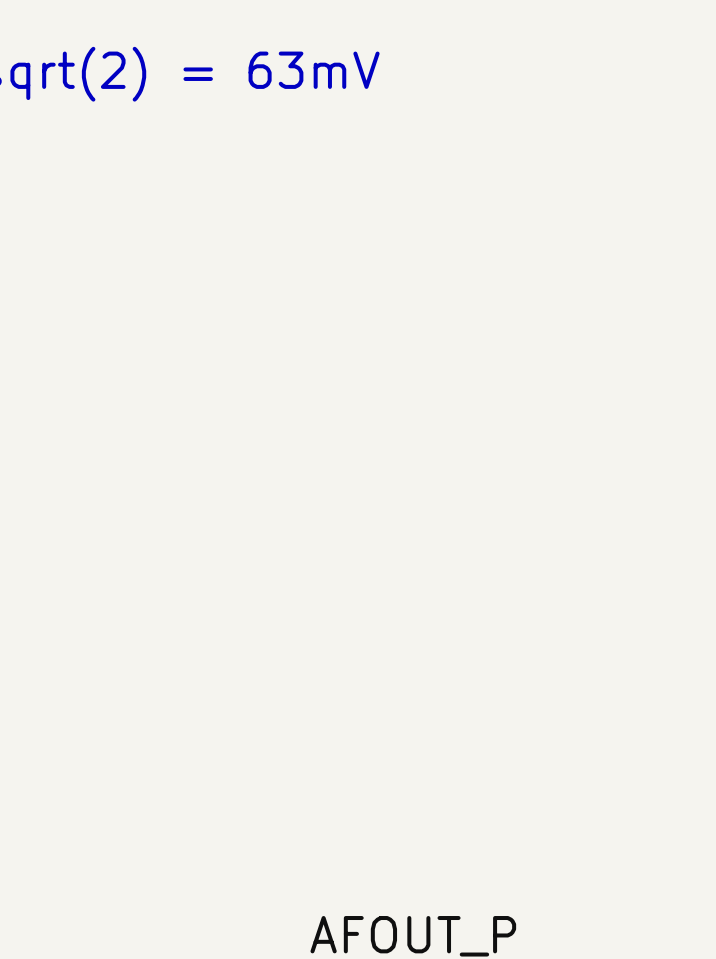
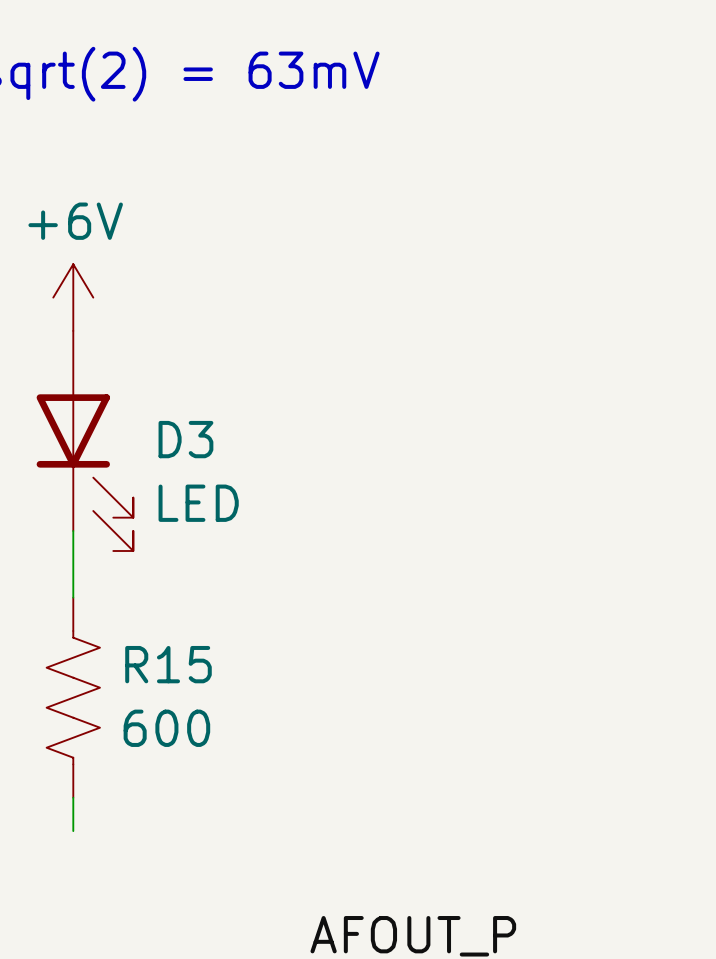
power symbol: none -> +6V (73, 297)
D3: none -> LED (84, 440)
wire: none -> (73, 530) (73, 597)
R15: none -> 600 (73, 697)
wire: none -> (73, 797) (73, 831)

